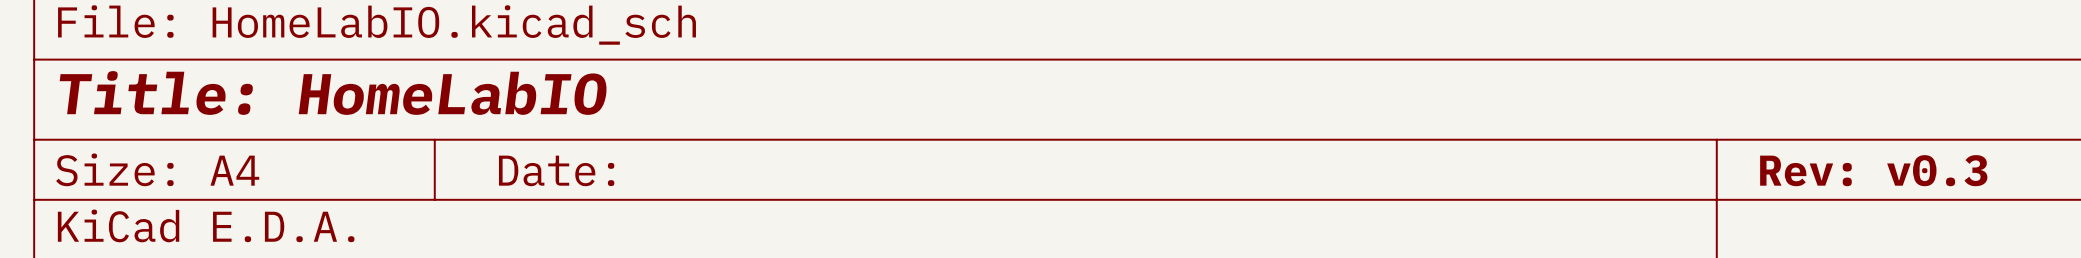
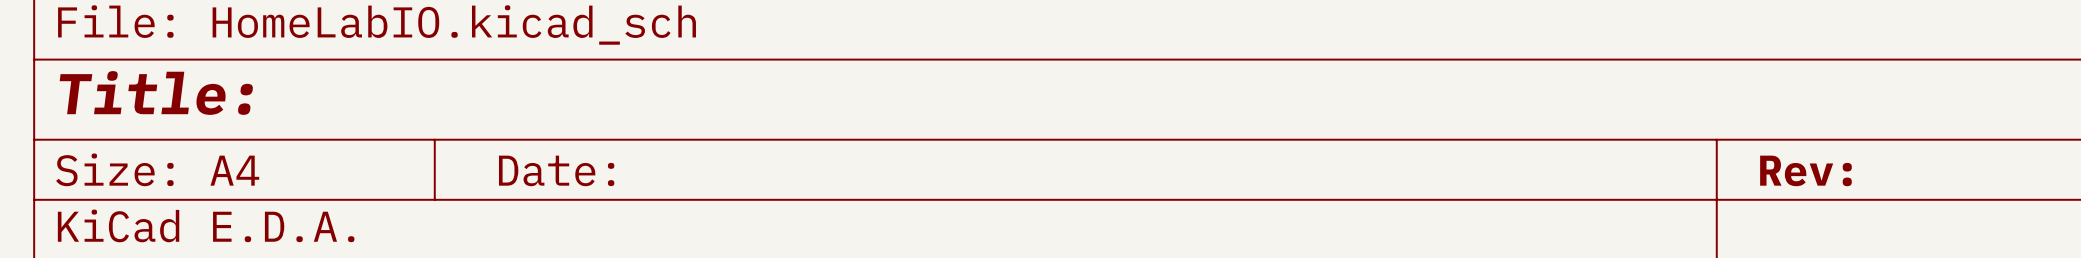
title block: Title: HomeLabIO (333, 92) -> Title: (156, 92)
title block: Rev: v0.3 (1873, 170) -> Rev: (1805, 170)

